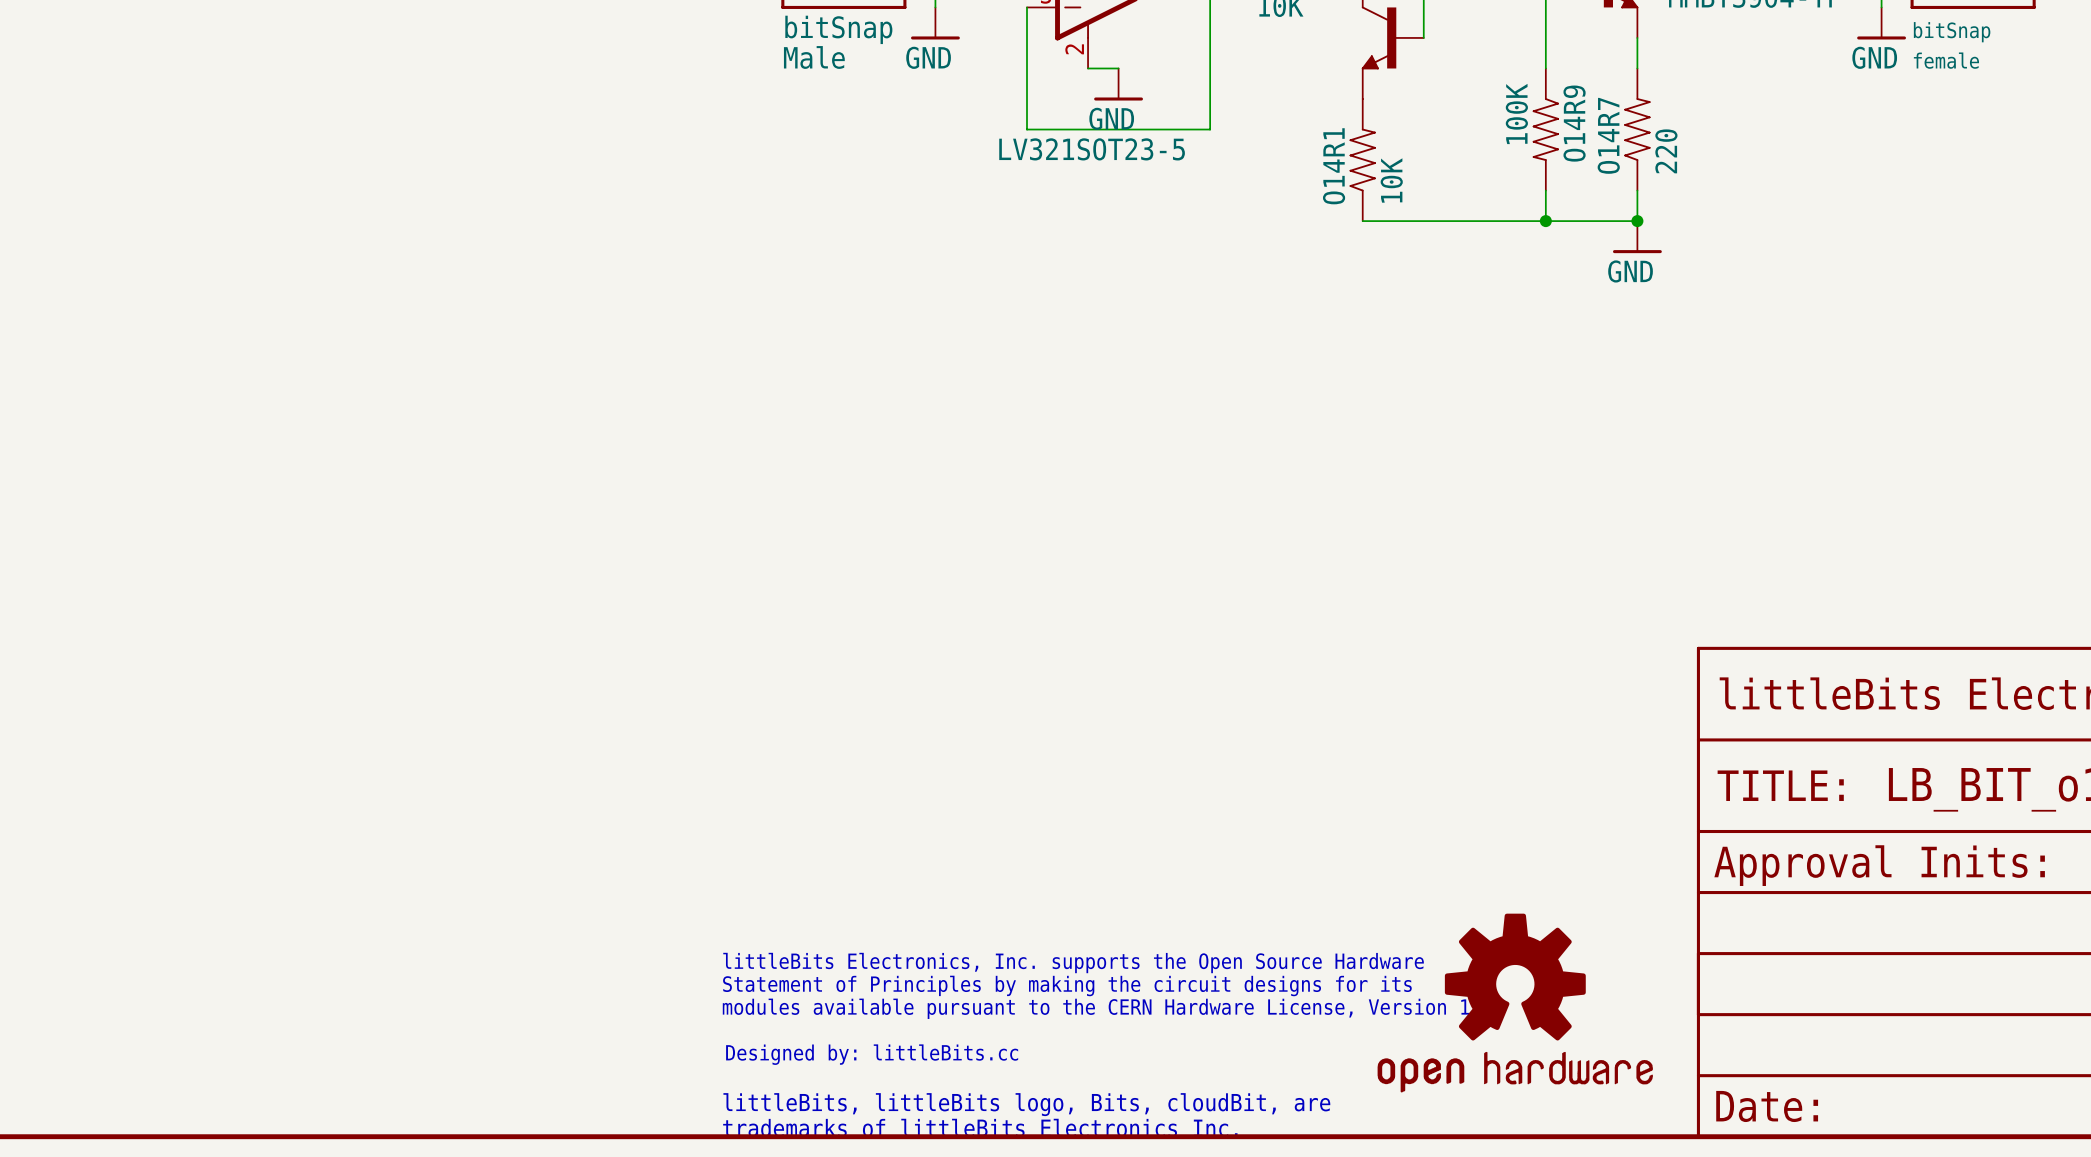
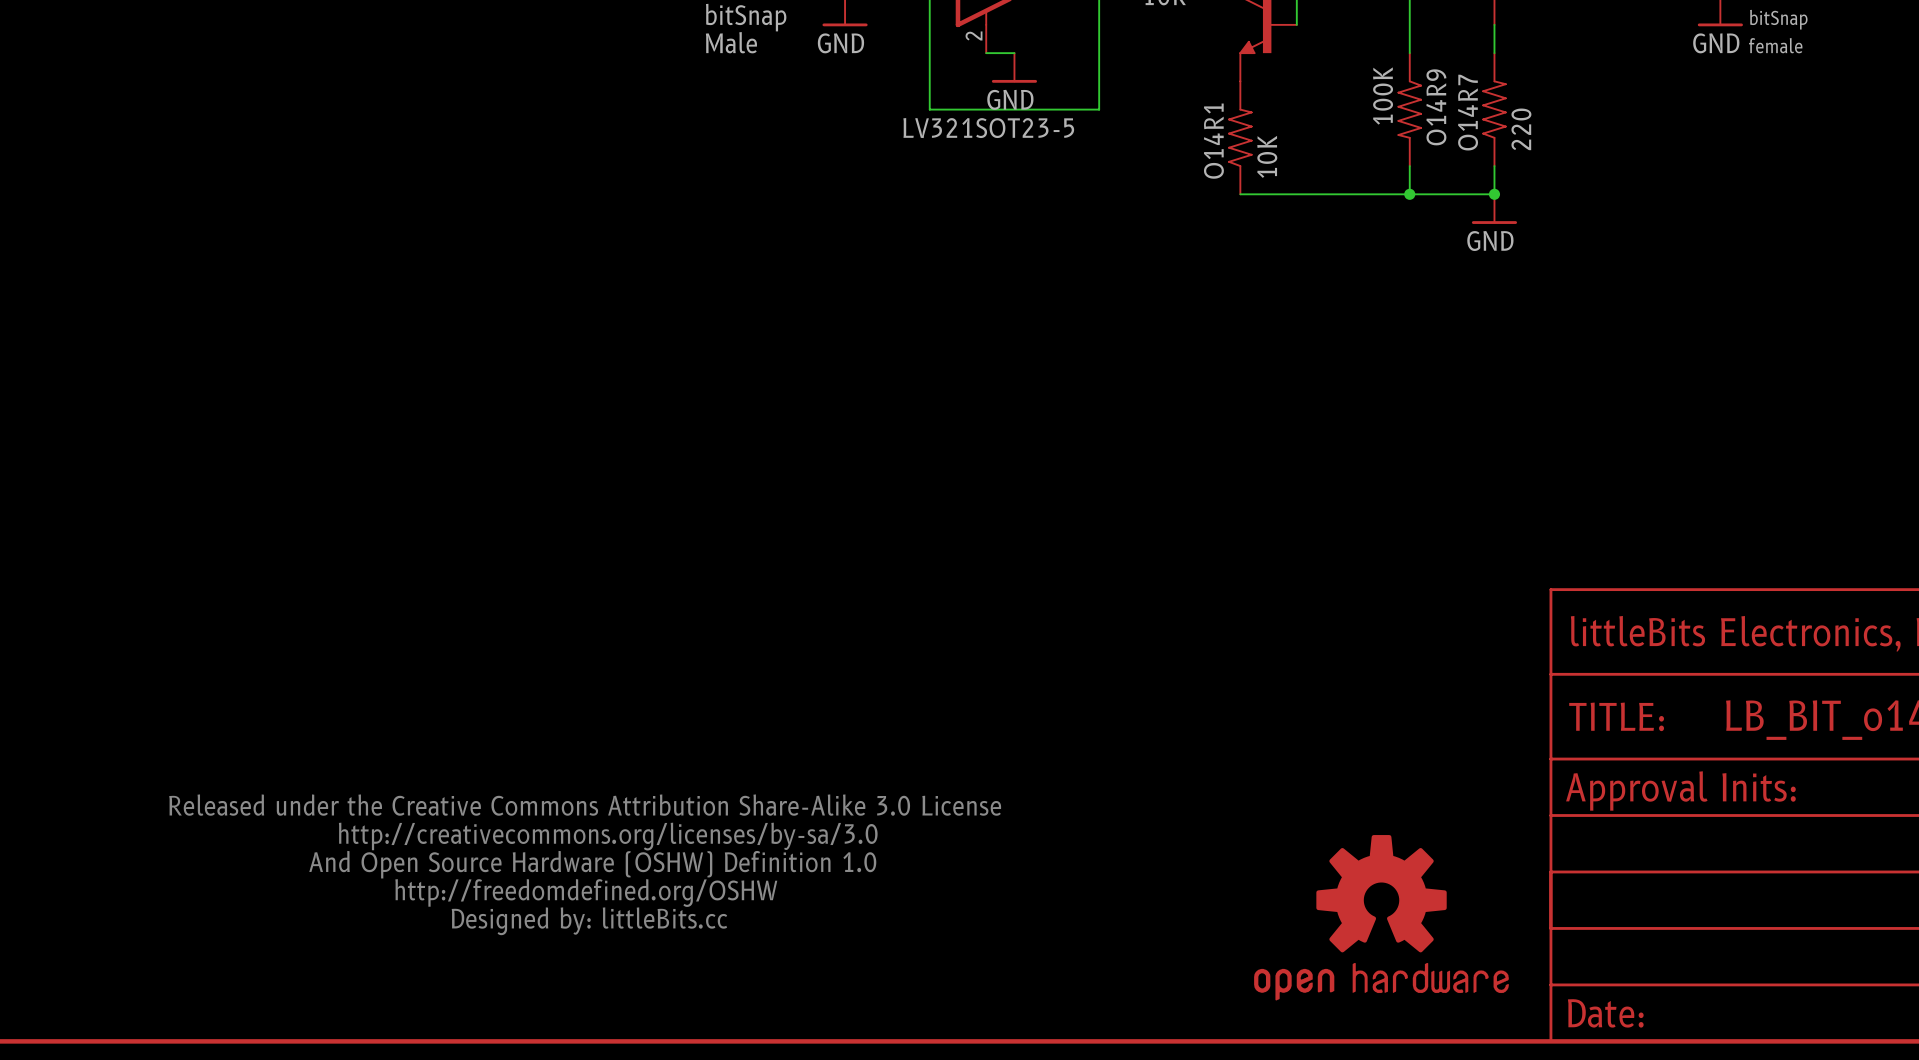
part: none -> (585, 864)
part: (1107, 1044) -> none

